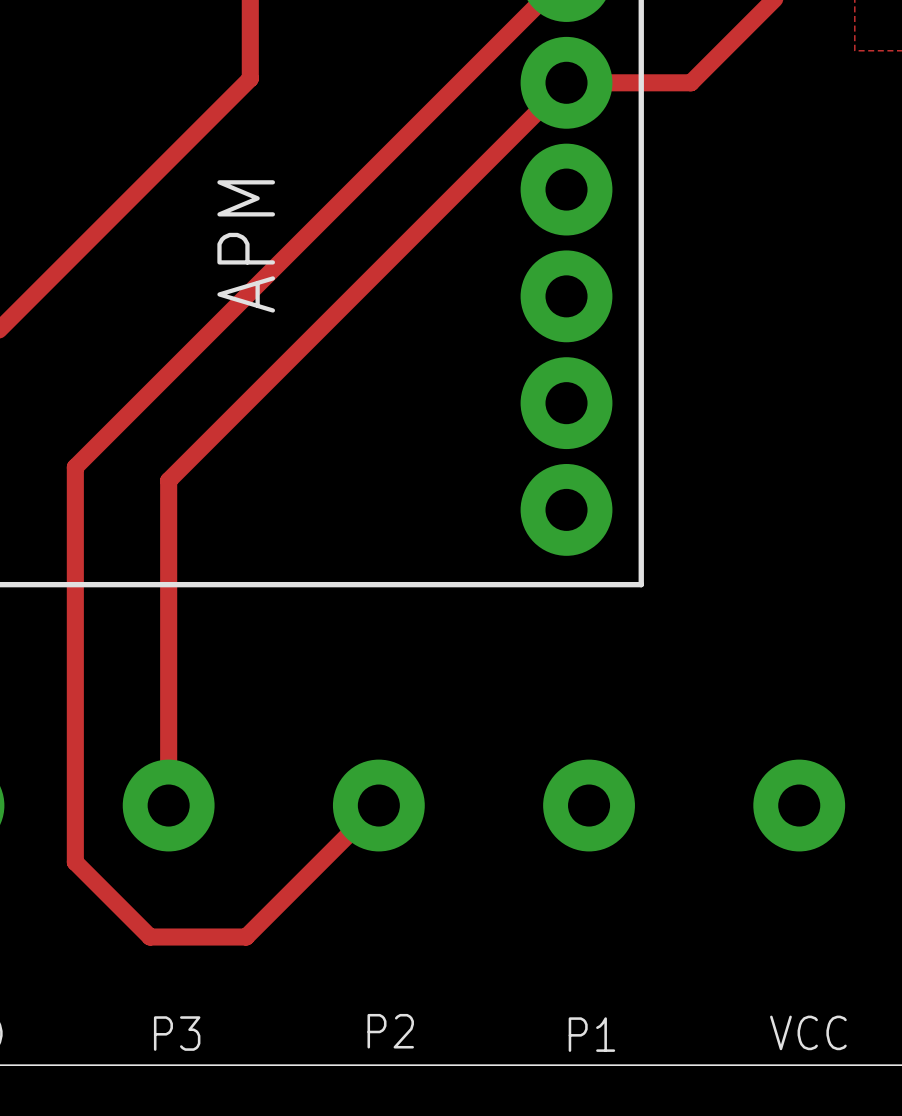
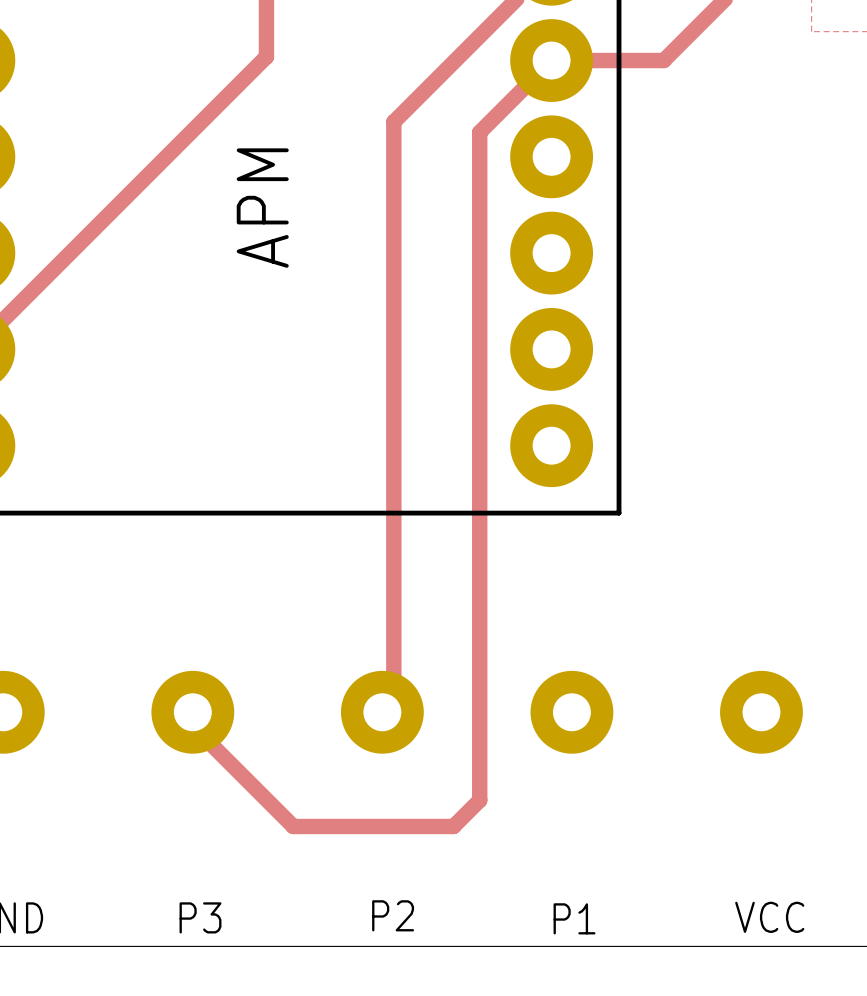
track: (391, 150) (75, 467) (75, 862) (150, 937) (246, 937) (378, 805) -> (393, 122) (393, 737)
track: (486, 162) (168, 480) (168, 805) -> (479, 132) (479, 800) (453, 826) (293, 826) (204, 737)

